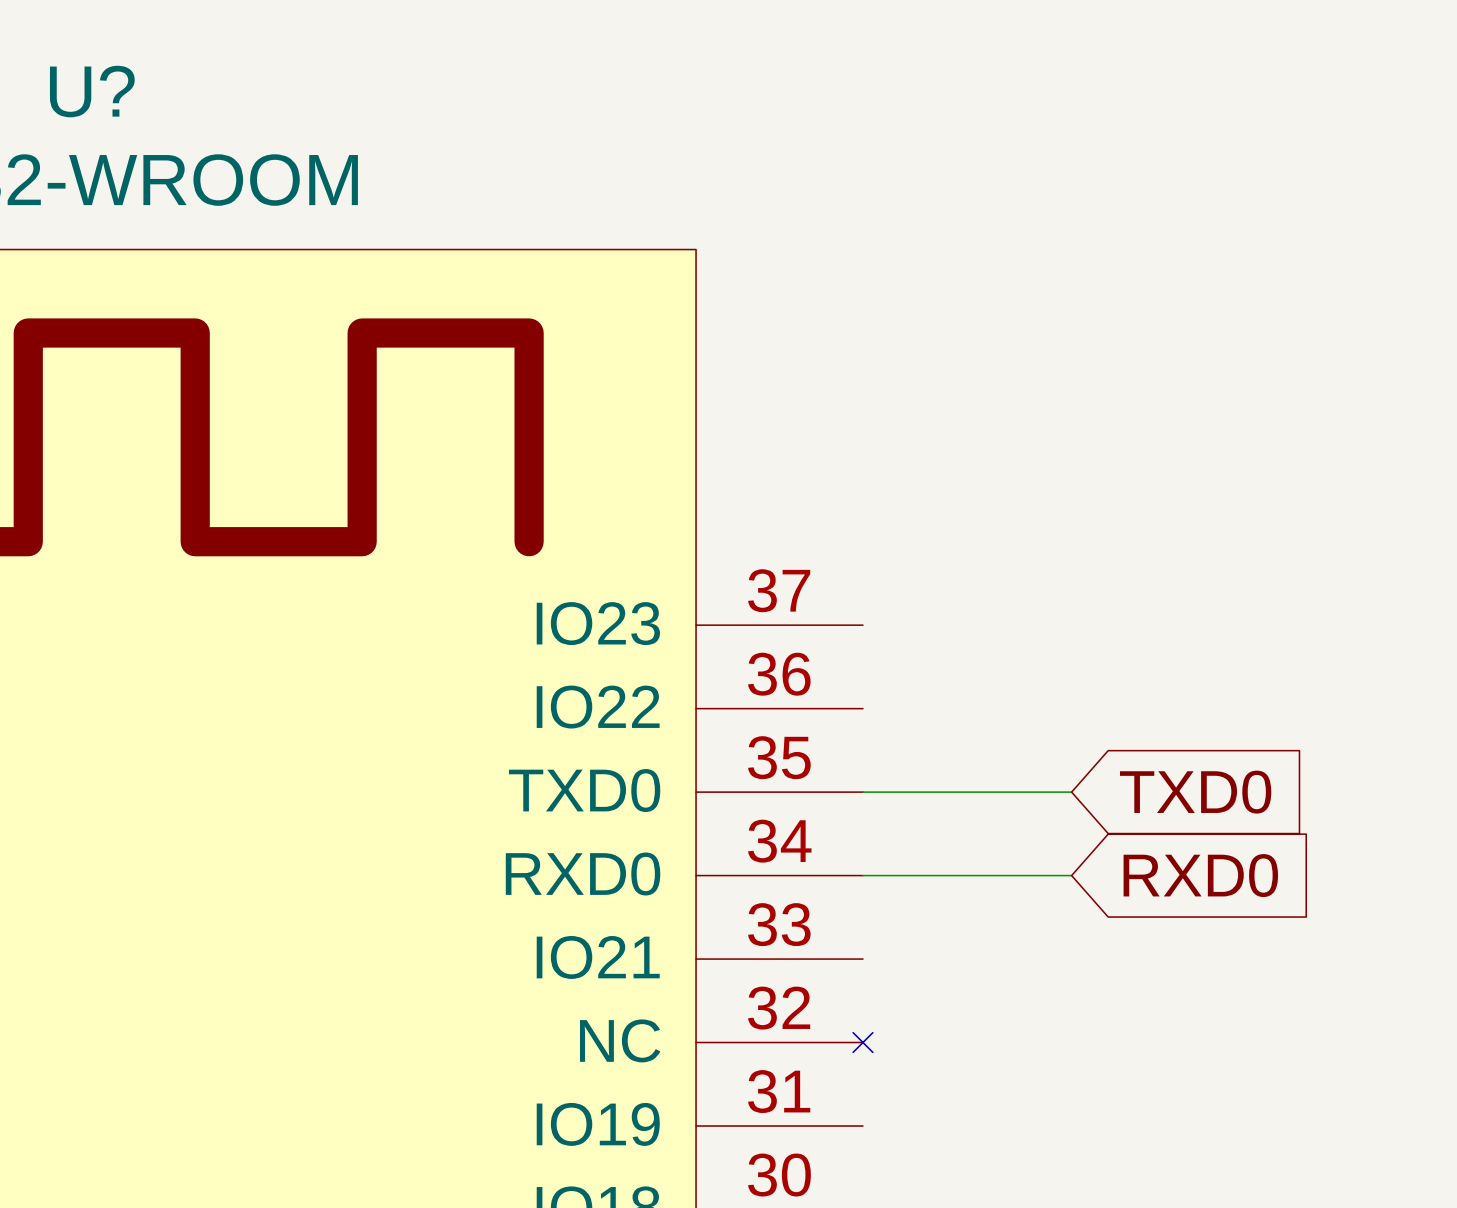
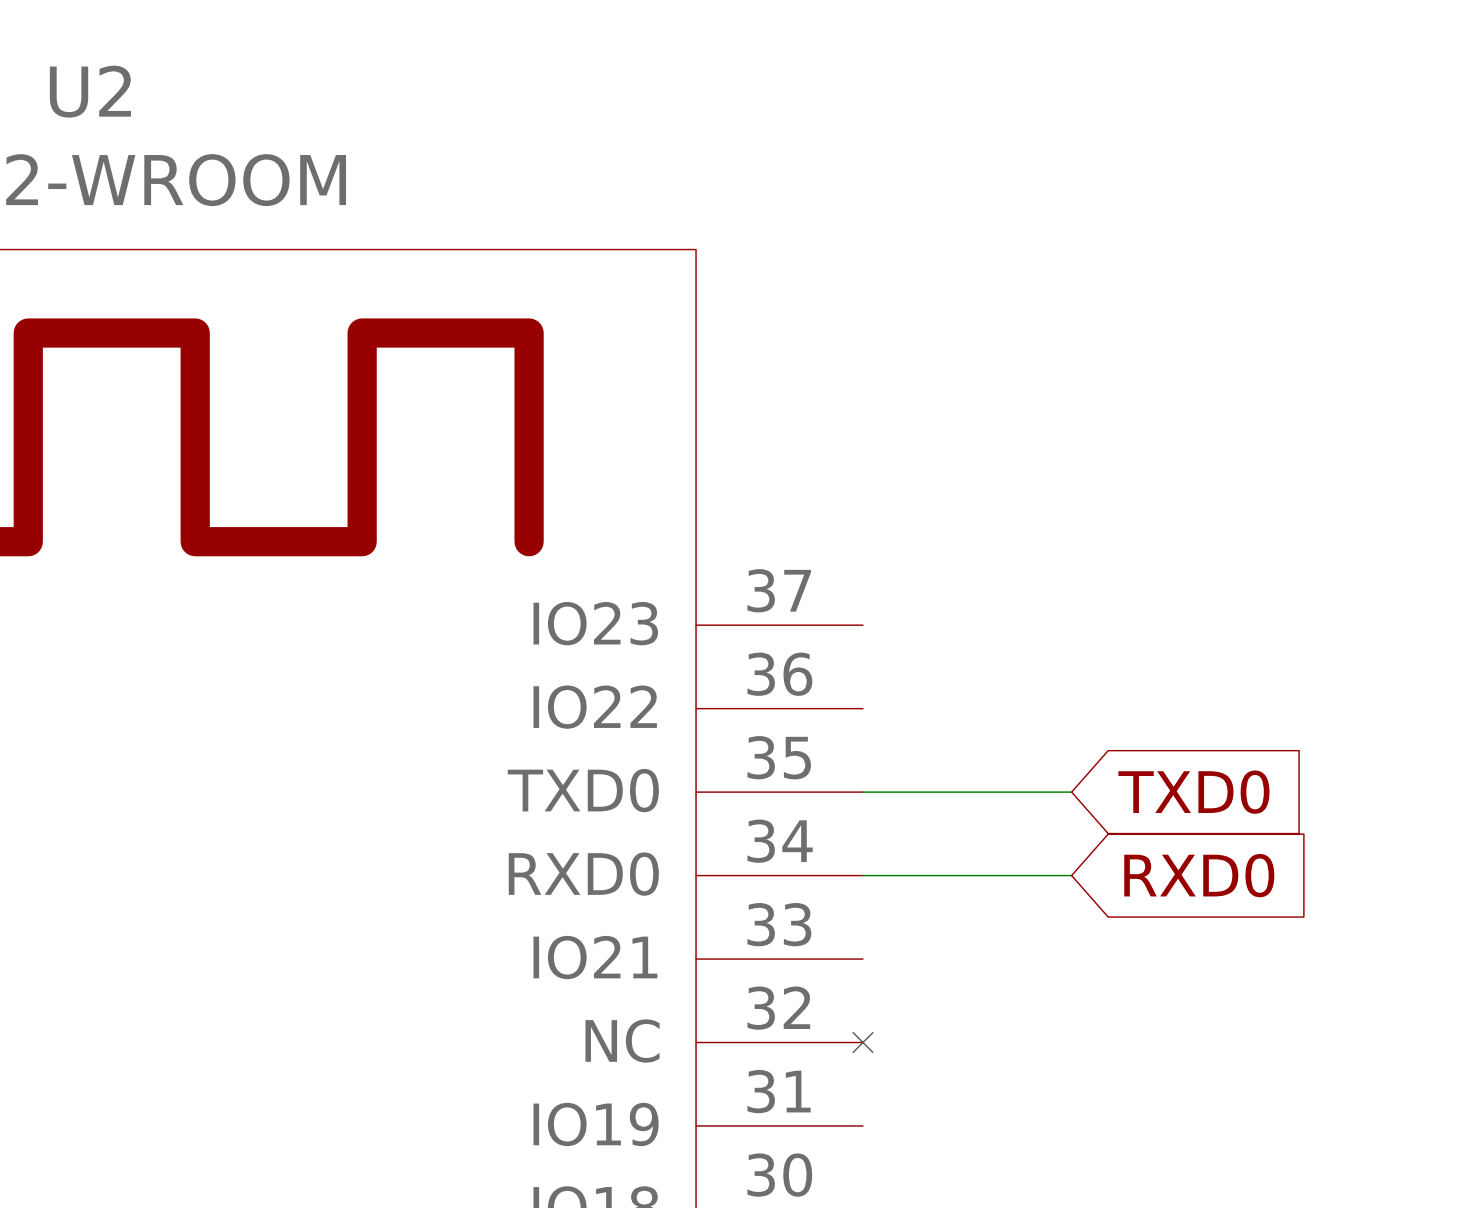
U? name: U? (92, 91) -> U2 (90, 91)

